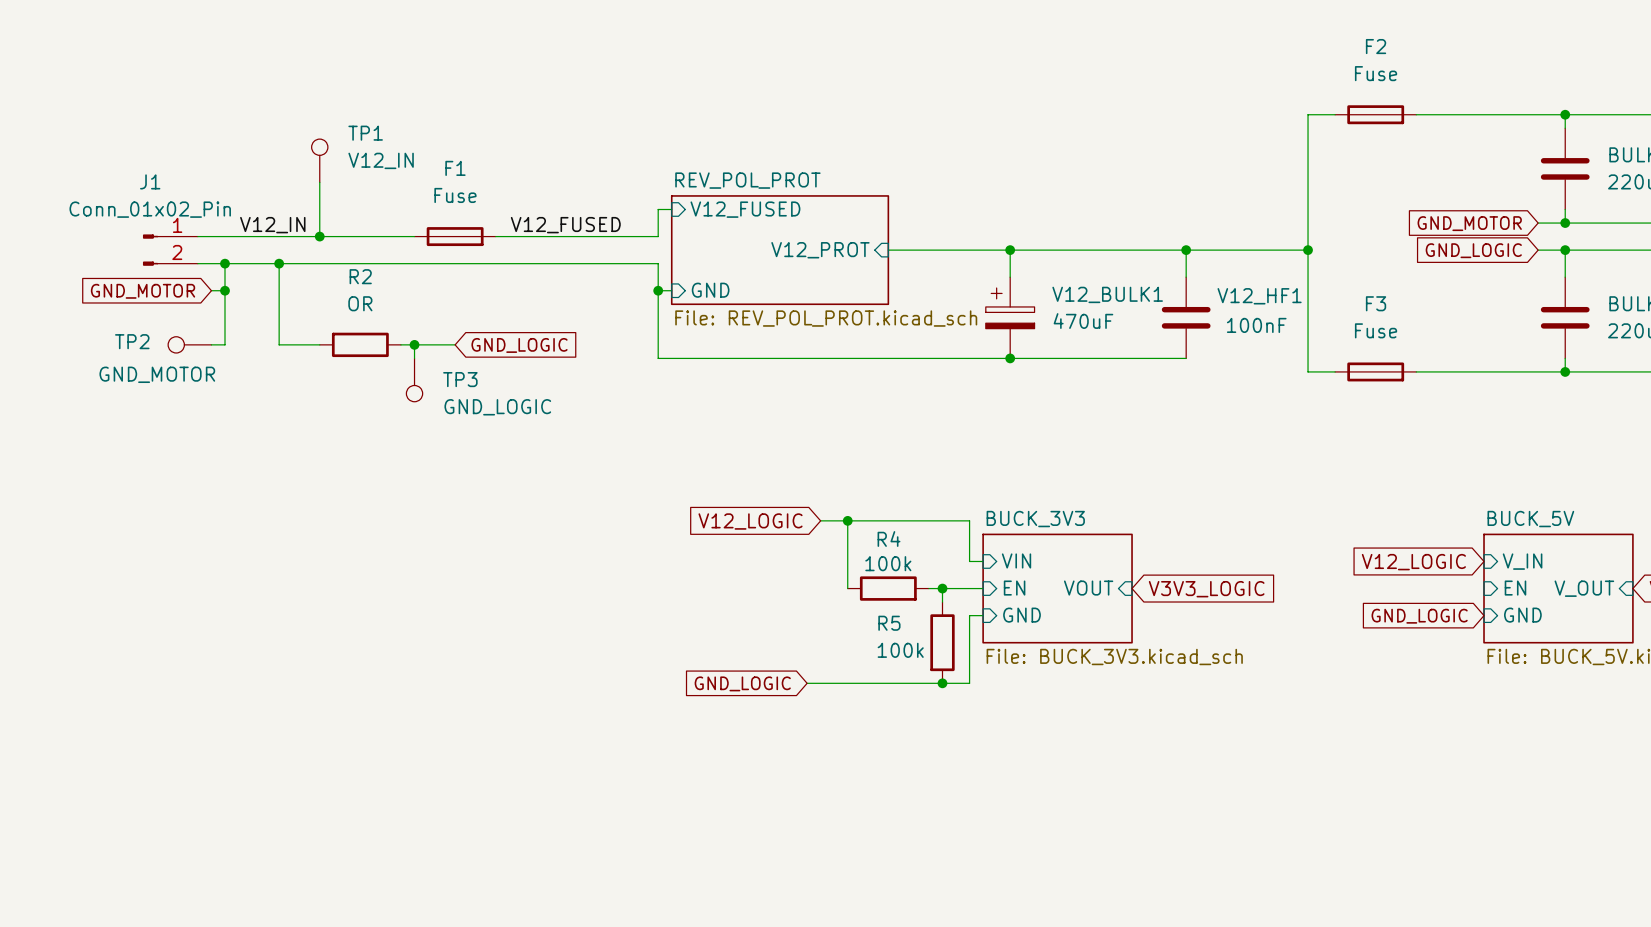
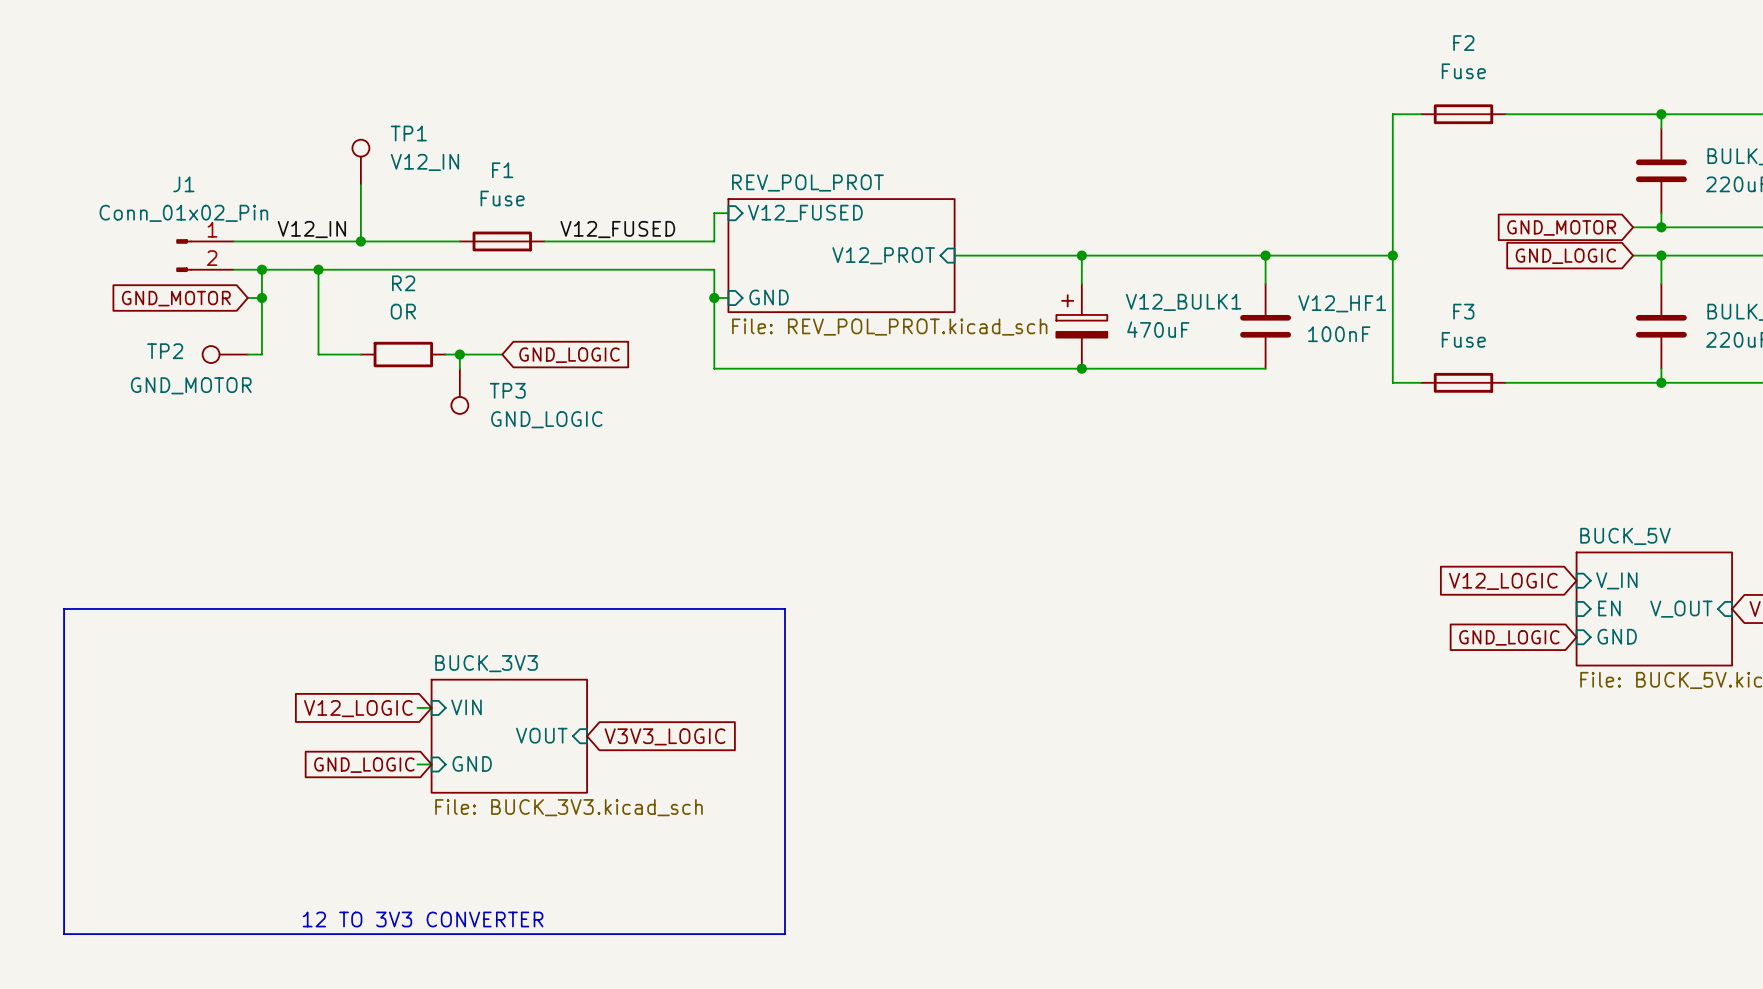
wire: (820, 520) (969, 520) (969, 561) (983, 561) -> none
wire: (847, 520) (847, 588) -> none
junction: (847, 520) -> none
global label: V12_LOGIC (750, 521) -> none
sheet pin: VIN (1016, 560) -> none
line: none -> (64, 608) (784, 608) (784, 934) (64, 934) (64, 608)
R4: 100k (888, 588) -> none
wire: (928, 588) (983, 588) -> none
wire: (942, 588) (942, 602) -> none
junction: (942, 588) -> none
sheet pin: EN (1014, 588) -> none
sheet BUCK_3V3 position: (1057, 588) -> (509, 736)
sheet pin: VOUT (1088, 588) -> none
global label: V3V3_LOGIC (1206, 589) -> none
wire: (983, 615) (969, 615) (969, 683) (807, 683) -> none
sheet pin: GND (1022, 615) -> none
R5: 100k (942, 642) -> none
sheet pin: none -> VIN (466, 707)
global label: none -> V12_LOGIC (358, 708)
wire: none -> (417, 707) (431, 707)
global label: GND_LOGIC (742, 683) -> none
junction: (942, 683) -> none
sheet pin: none -> VOUT (541, 735)
global label: none -> V3V3_LOGIC (665, 736)
sheet pin: none -> GND (472, 763)
wire: none -> (417, 764) (431, 764)
global label: none -> GND_LOGIC (364, 765)
text: none -> 12 TO 3V3 CONVERTER (423, 919)

